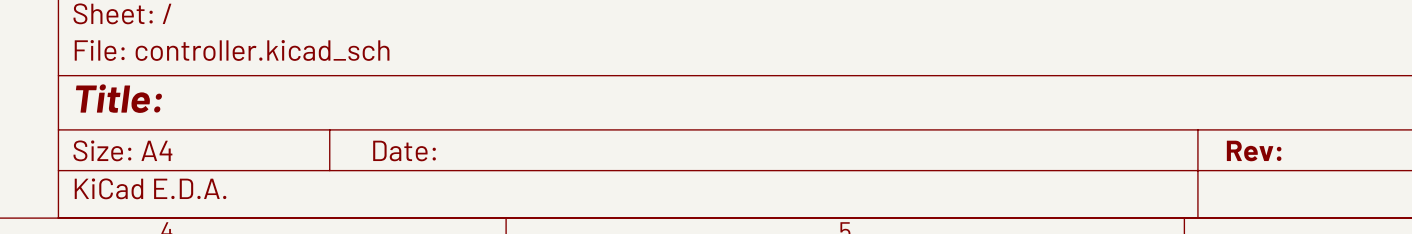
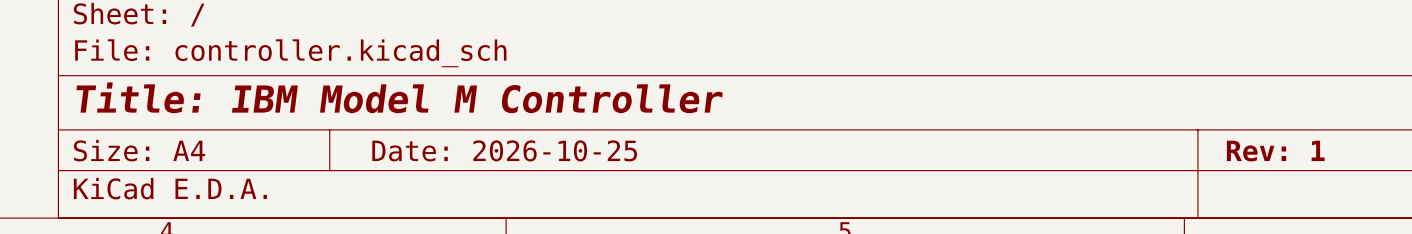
title block: Title: (118, 98) -> Title: IBM Model M Controller (399, 97)
title block: Rev: (1254, 150) -> Rev: 1 (1275, 151)
title block: Date: (404, 151) -> Date: 2026-10-25 (504, 150)

